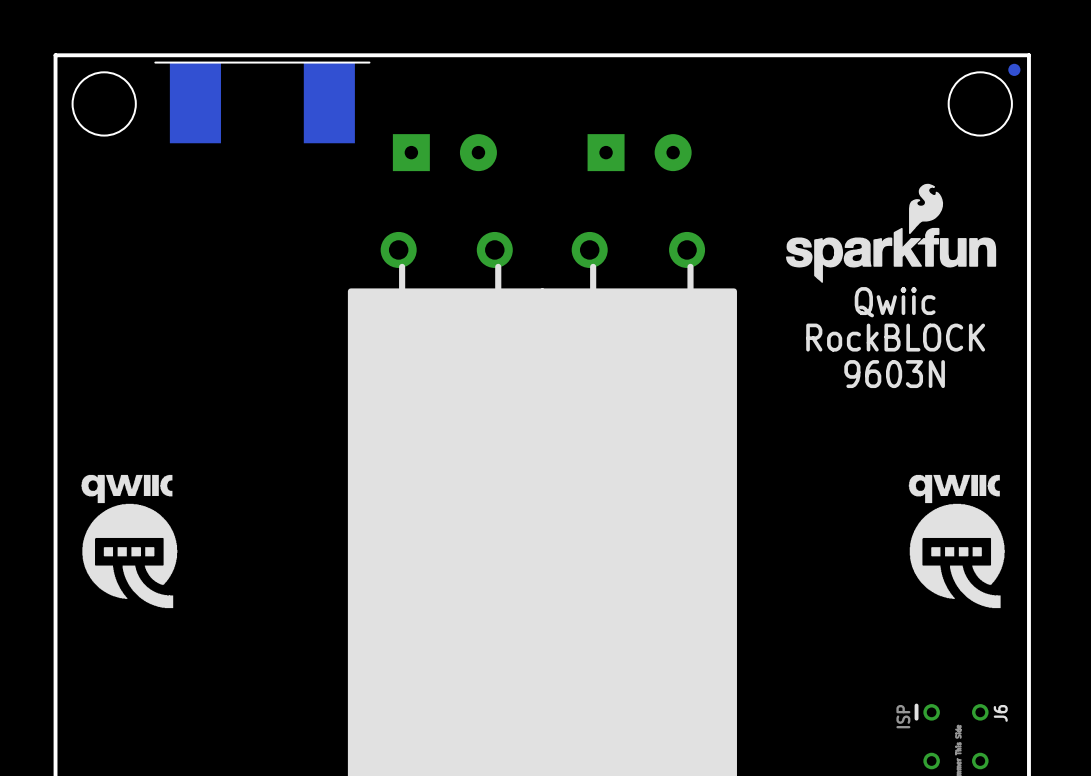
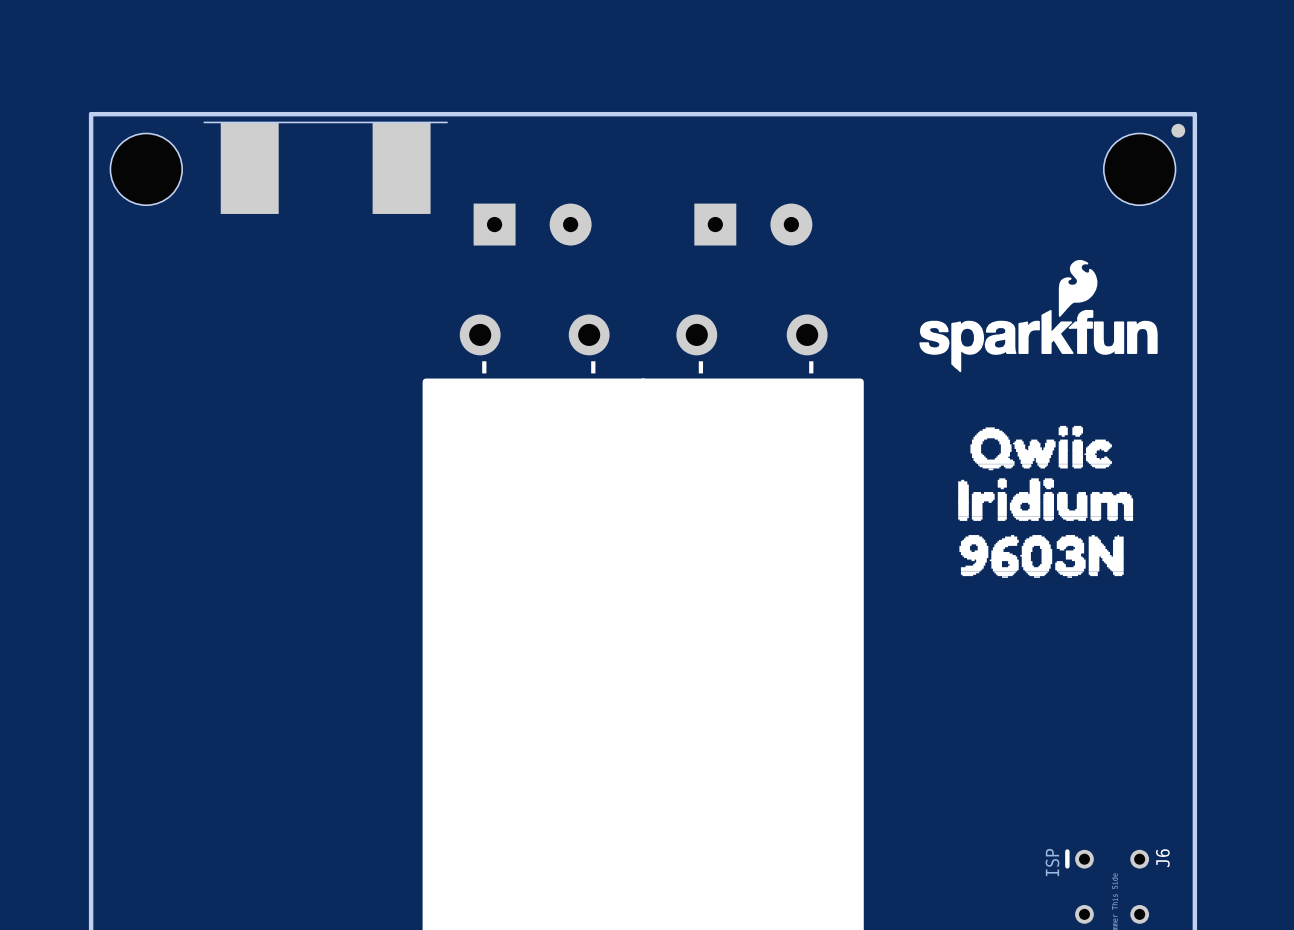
text: Qwiic (895, 302) -> none
drawing: none -> [958, 425, 1134, 578]
text: RockBLOCK (895, 337) -> none
text: 9603N (894, 374) -> none
drawing: [81, 474, 178, 609] -> none
drawing: [908, 474, 1005, 609] -> none

